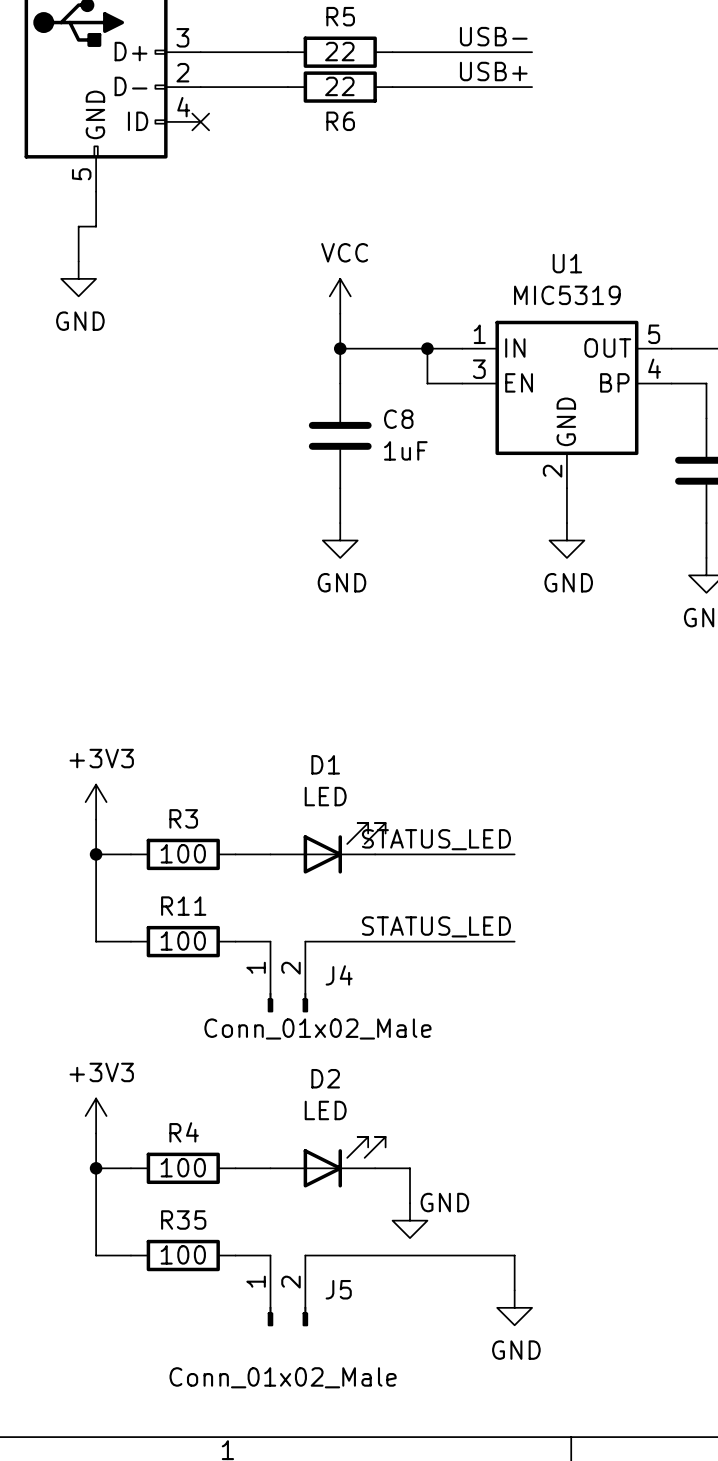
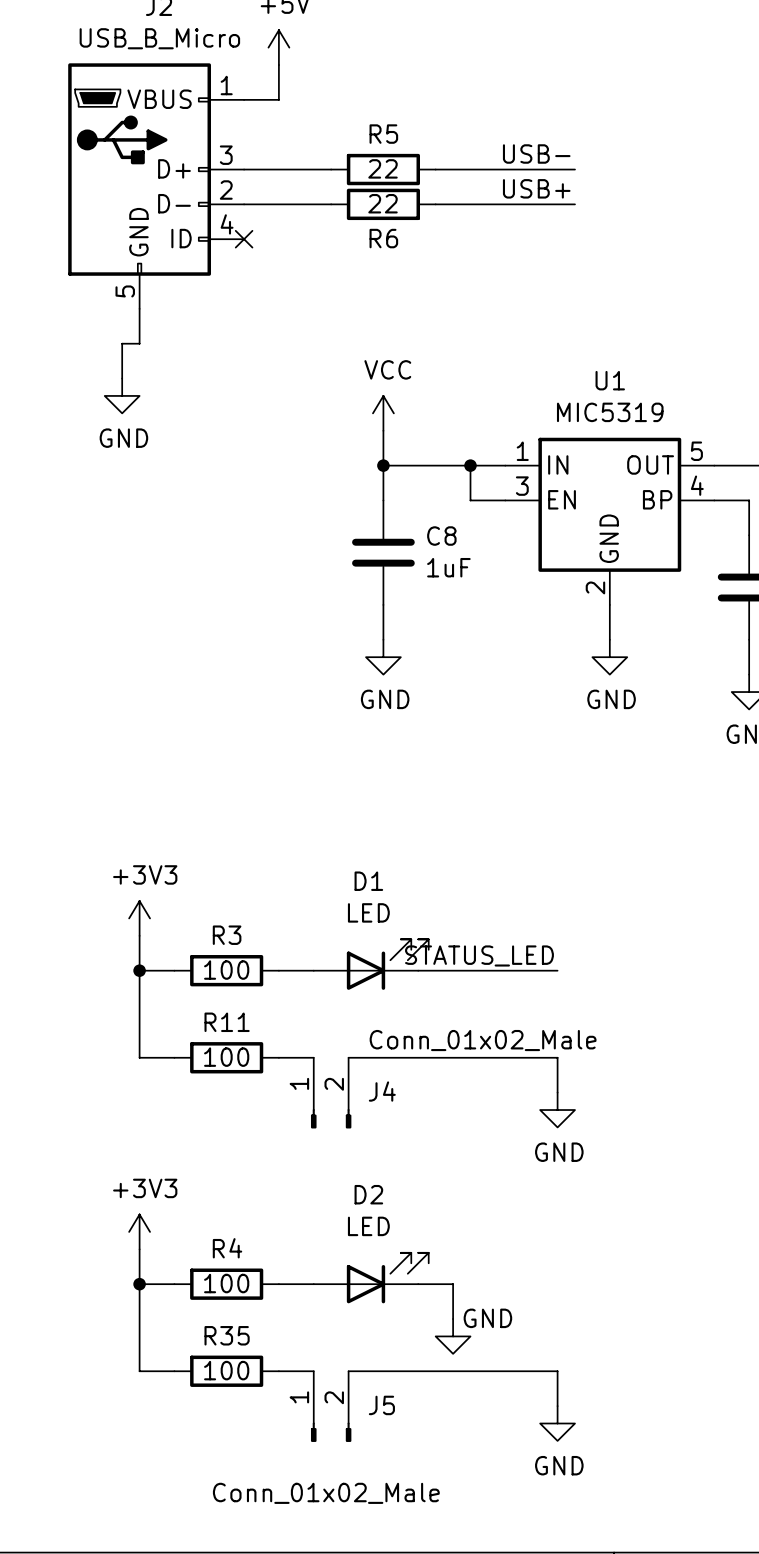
label: STATUS_LED (436, 926) -> none
wire: none -> (557, 1057) (557, 1092)
power symbol: none -> GND (557, 1110)
J4 value position: Conn_01x02_Male (317, 1028) -> Conn_01x02_Male (483, 1040)

